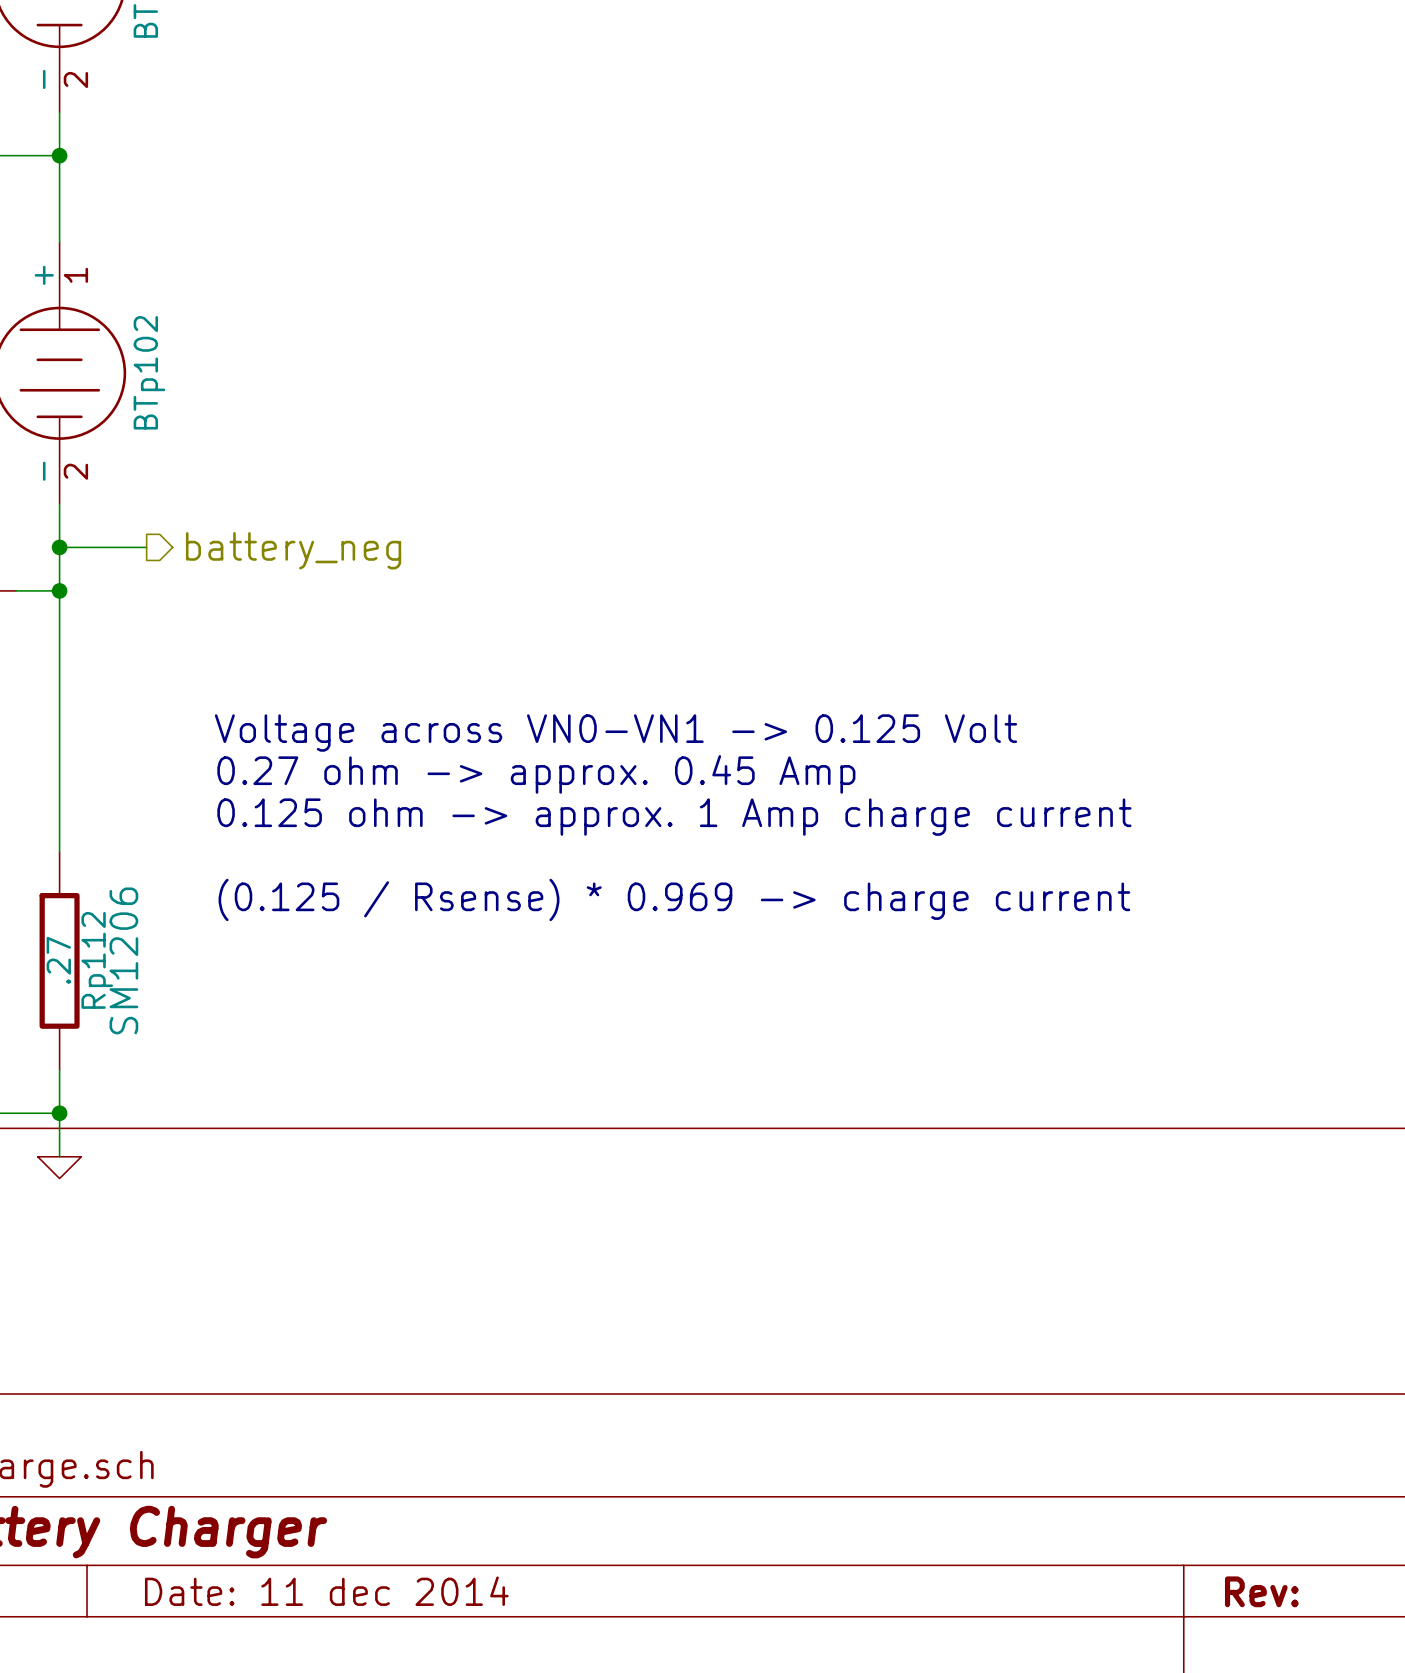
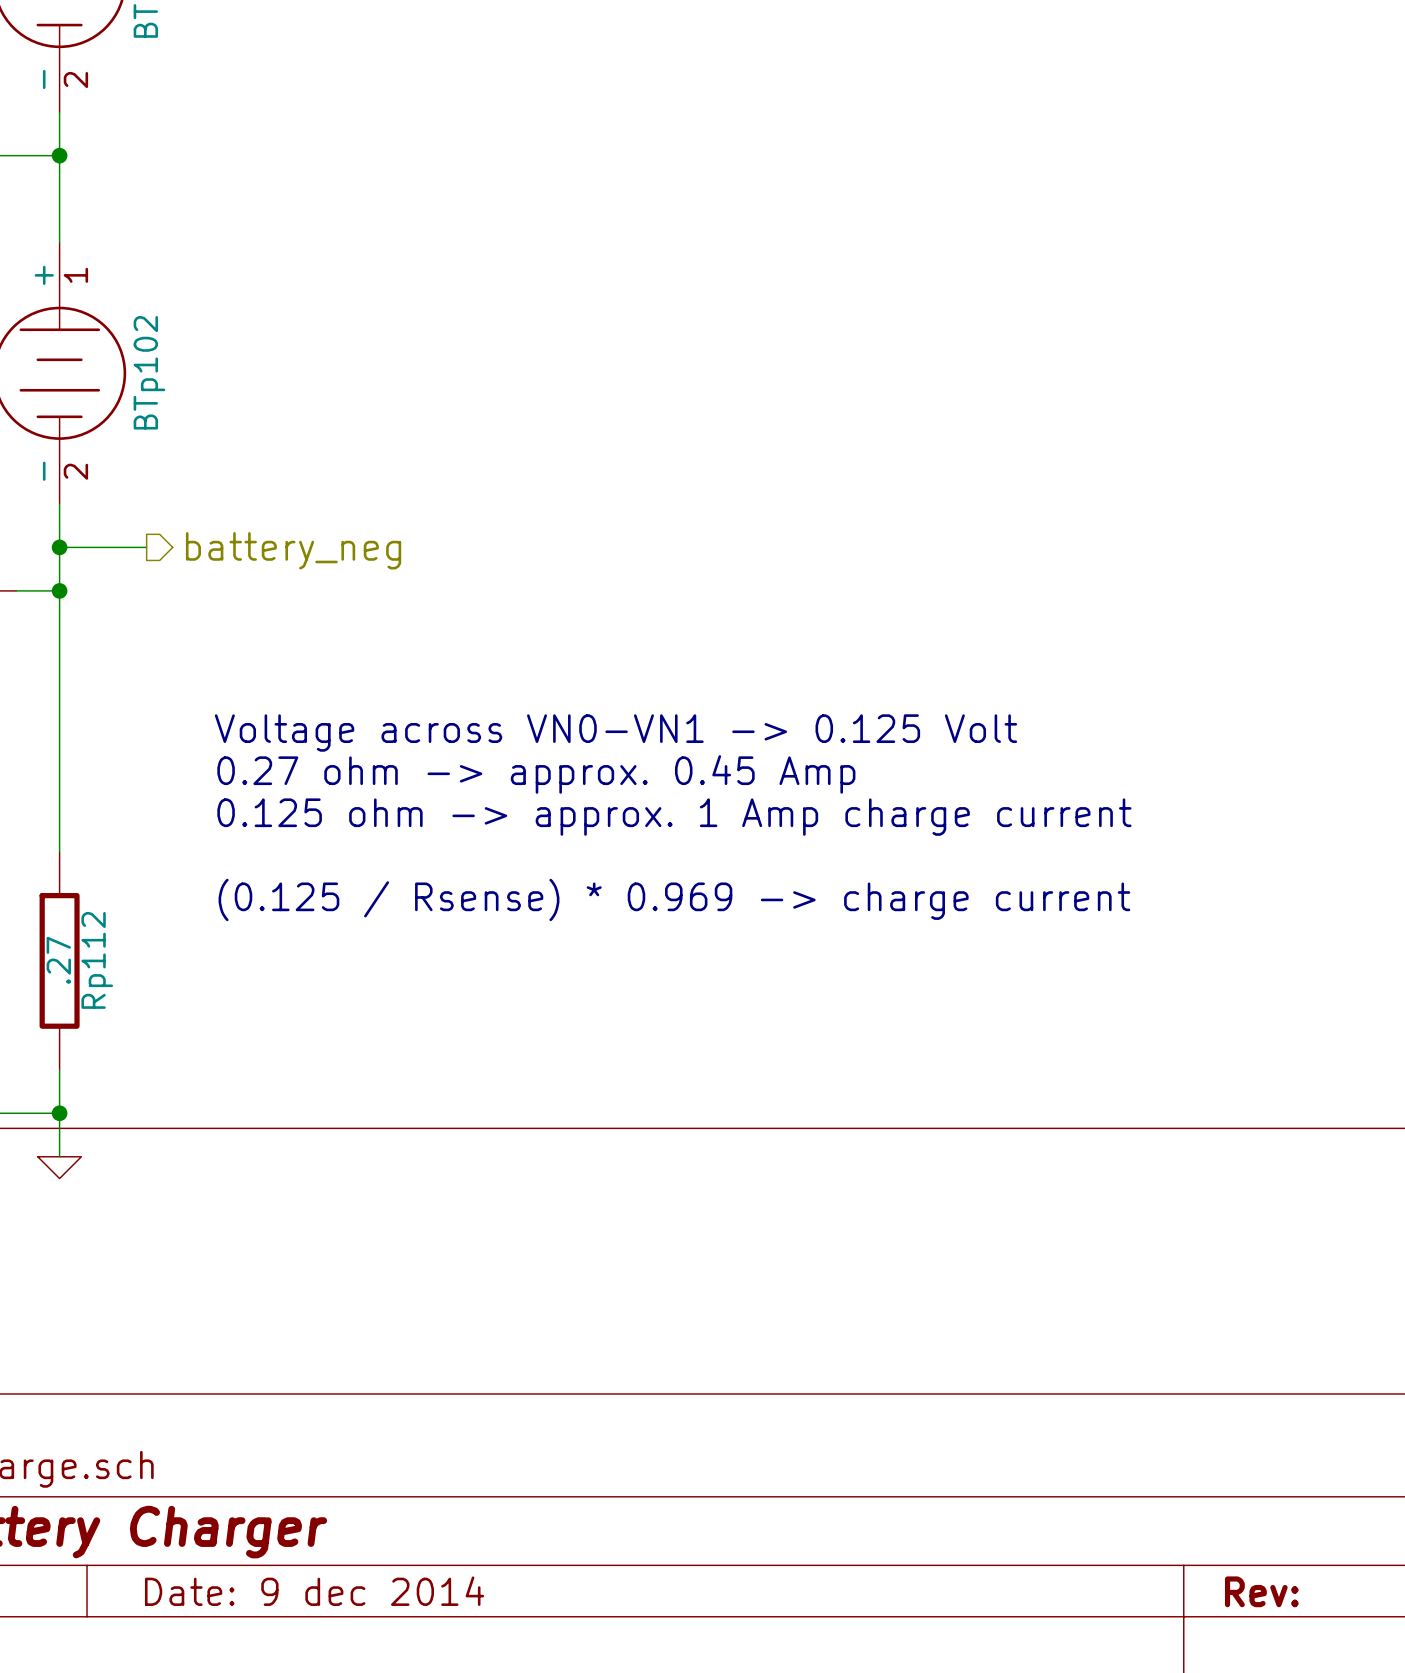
Rp112 text: SM1206 (123, 960) -> none
title block: Date: 11 dec 2014 (326, 1591) -> Date: 9 dec 2014 (314, 1591)

